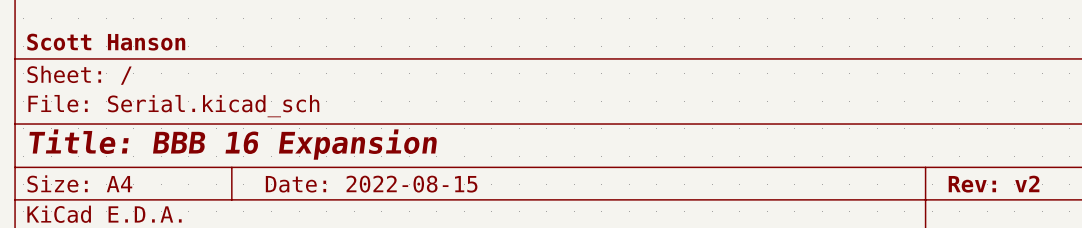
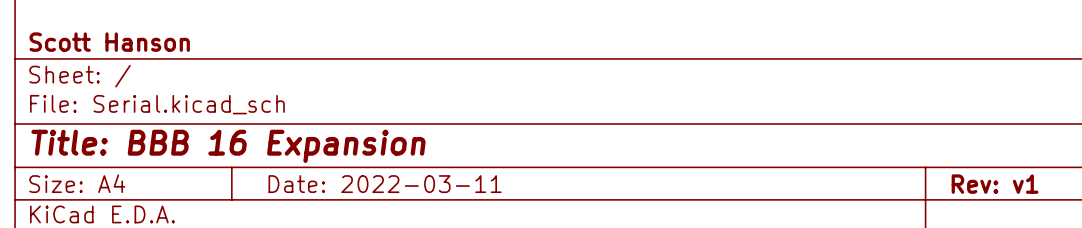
title block: Date: 2022-08-15 (371, 184) -> Date: 2022-03-11 (385, 184)
title block: Rev: v2 (994, 184) -> Rev: v1 (995, 184)

